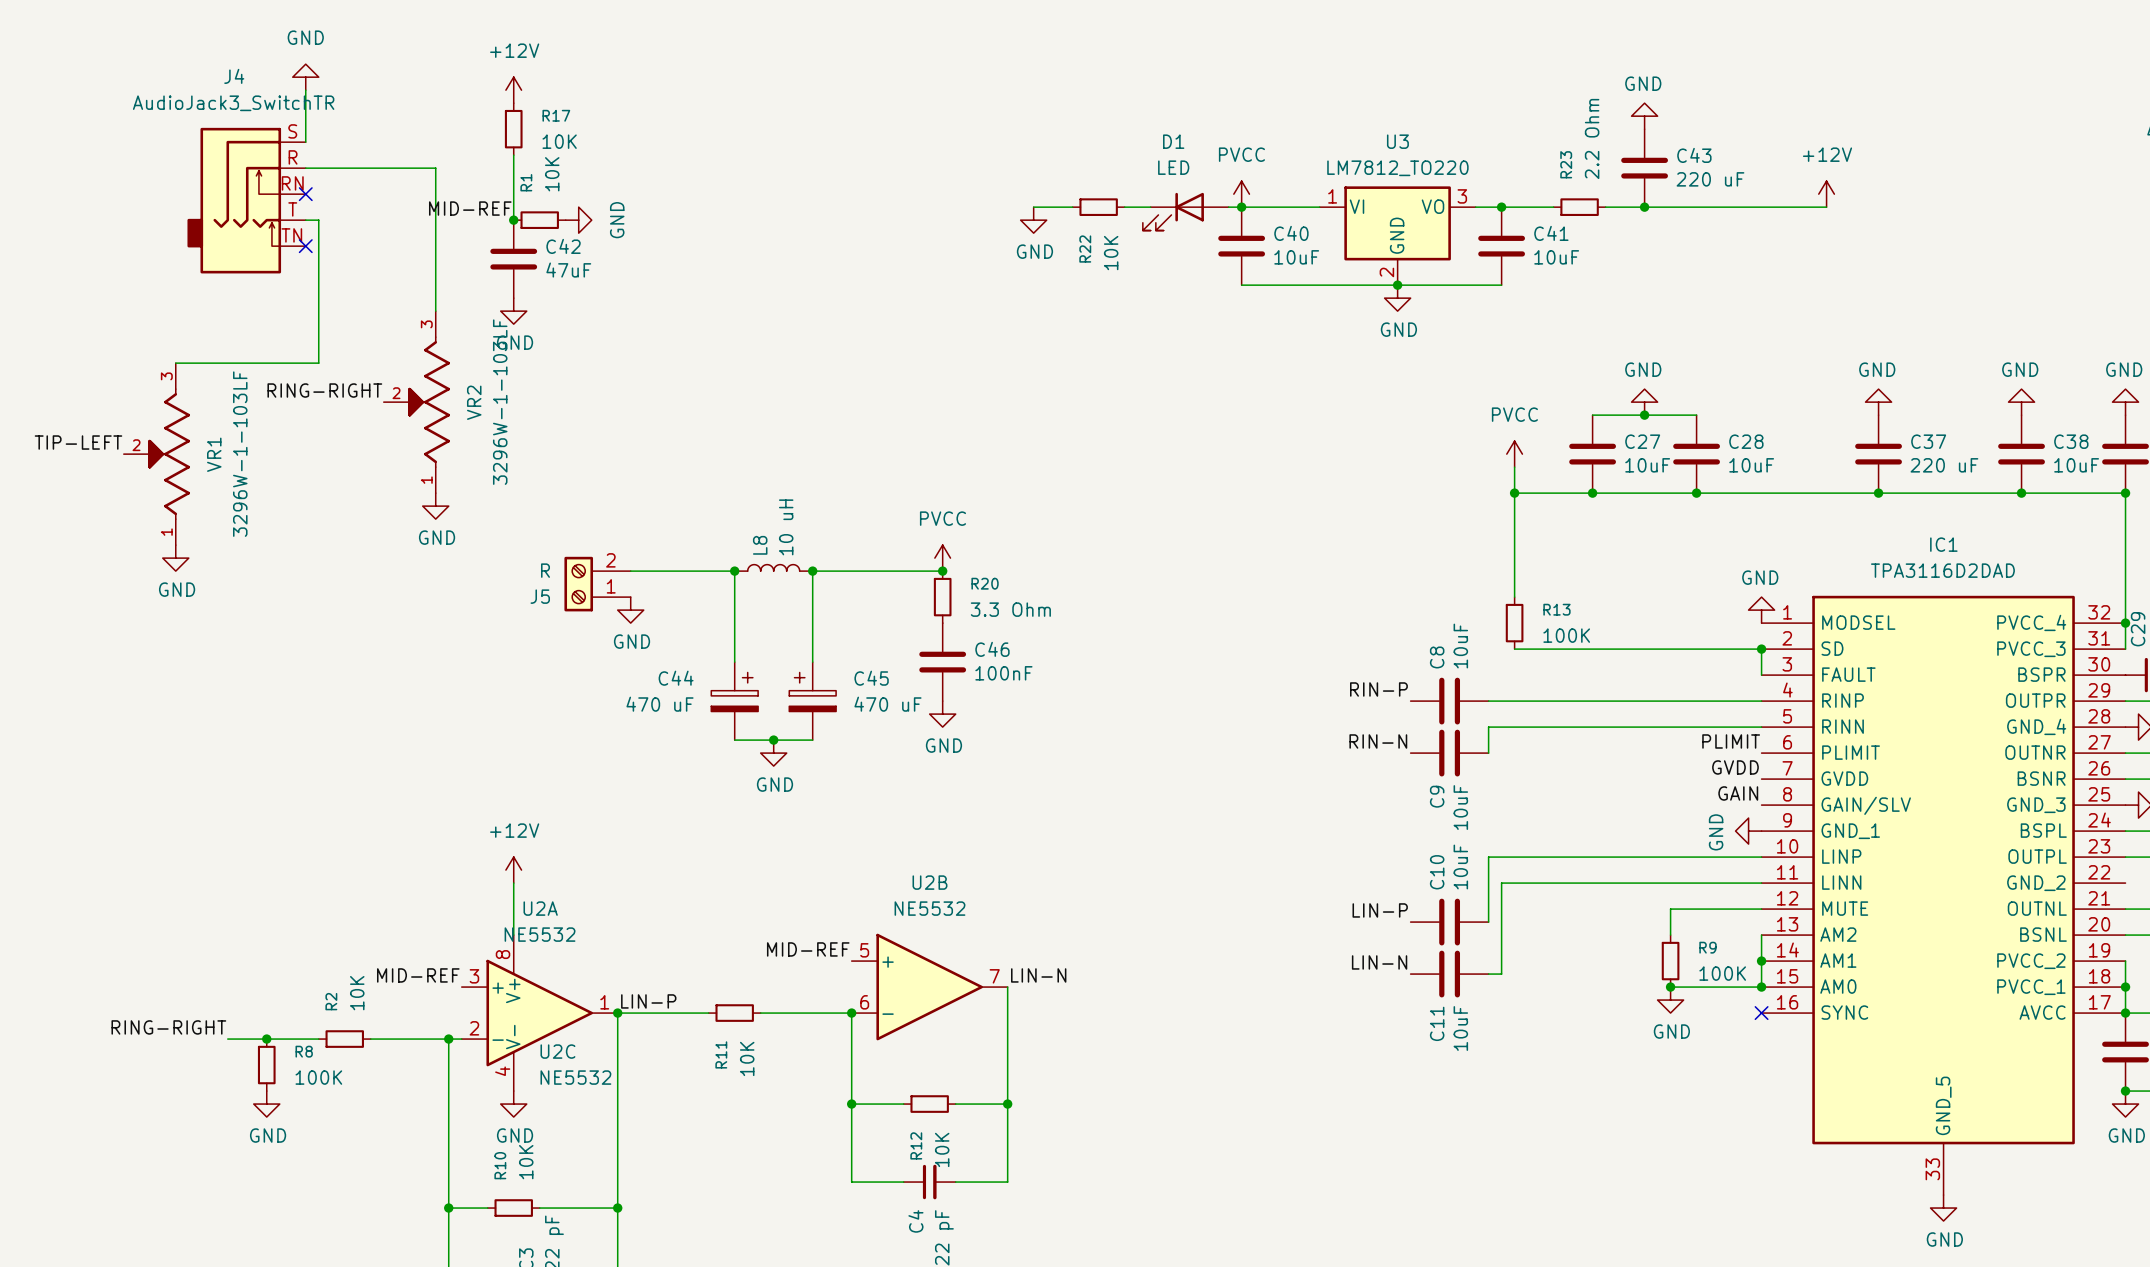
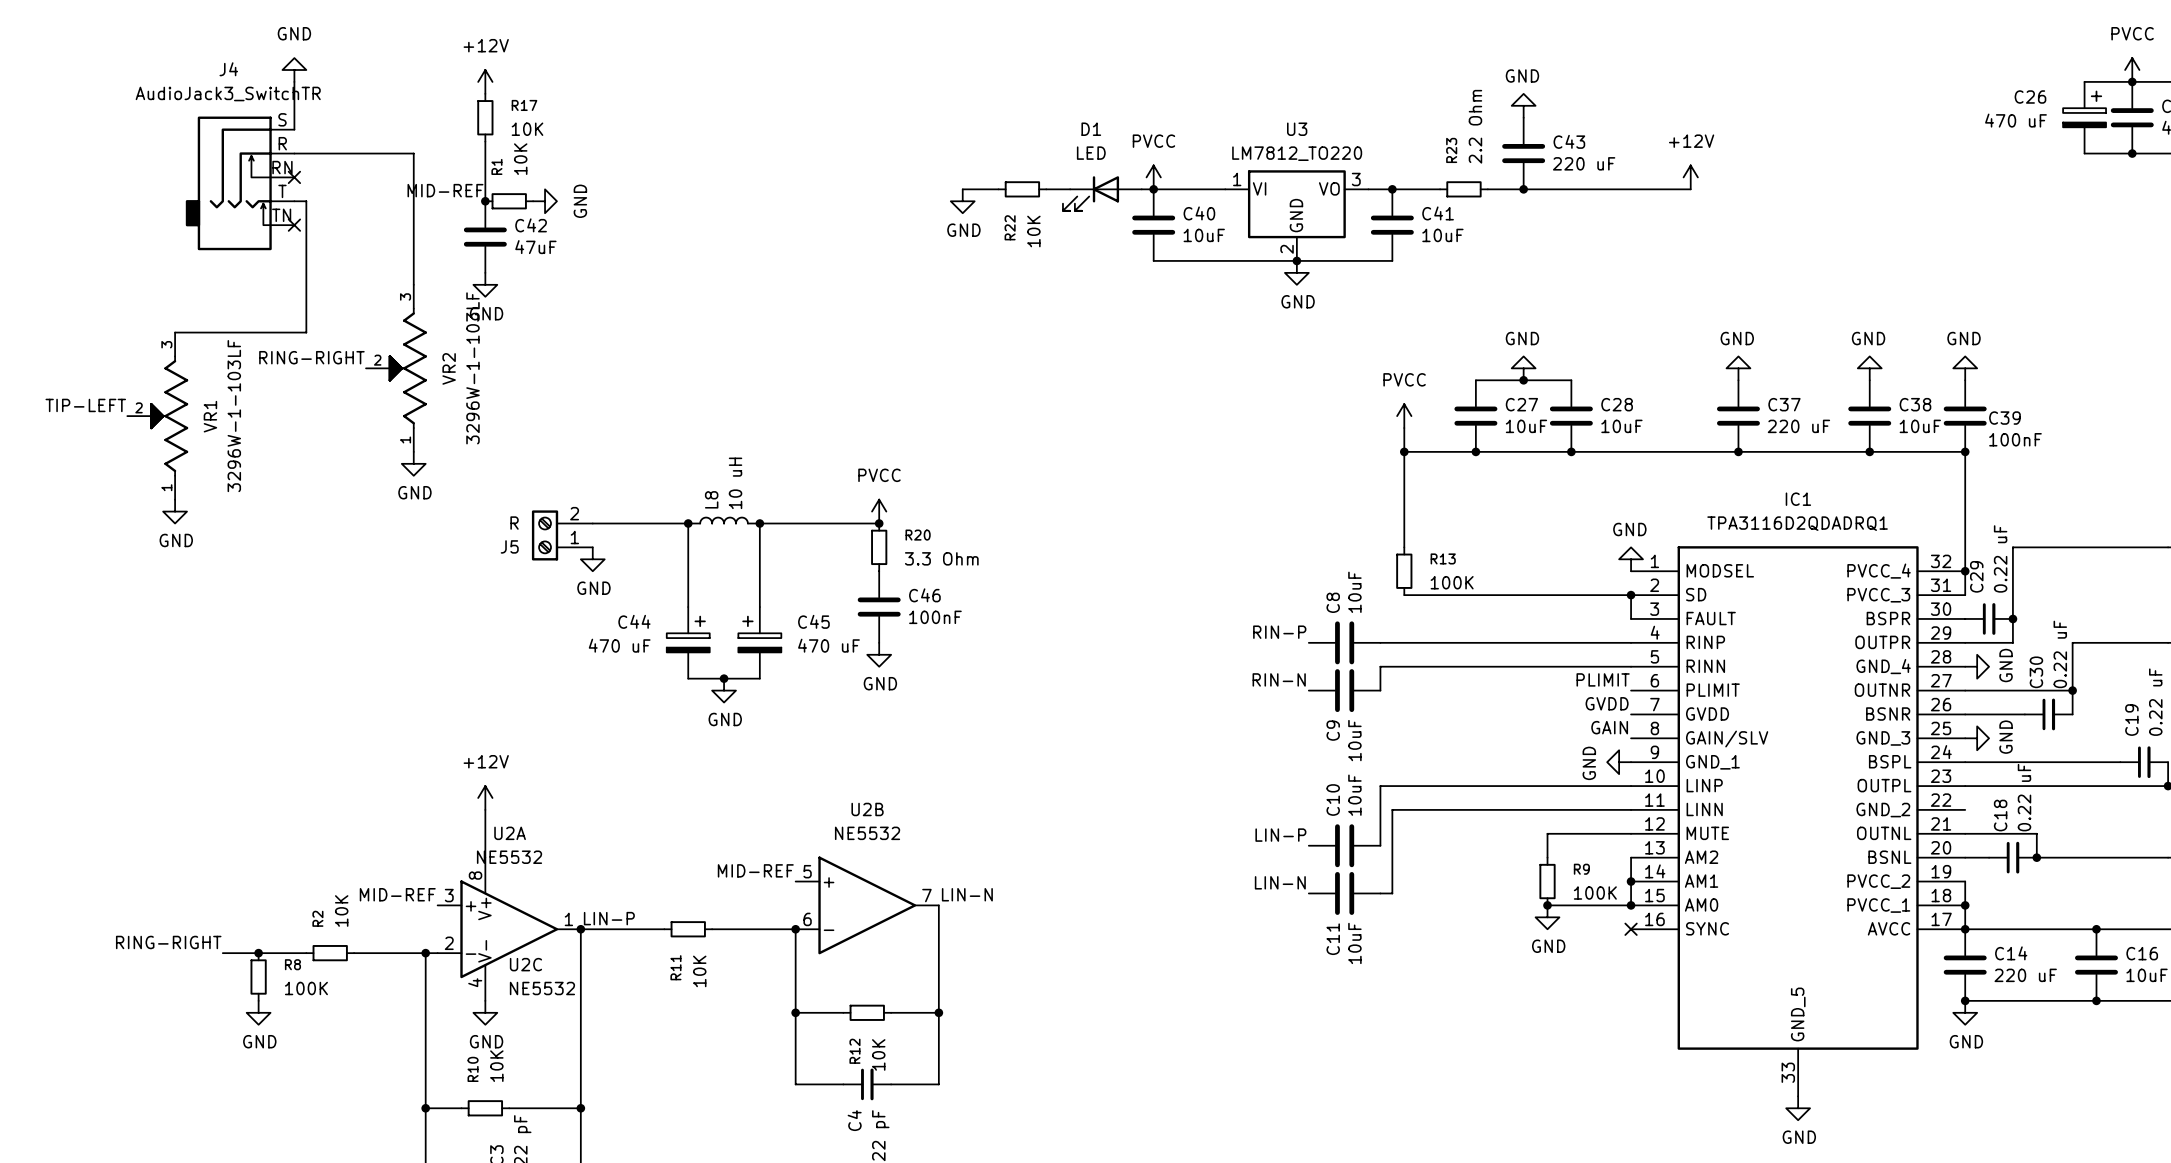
IC1 value: TPA3116D2DAD (1942, 570) -> TPA3116D2QDADRQ1 (1797, 523)

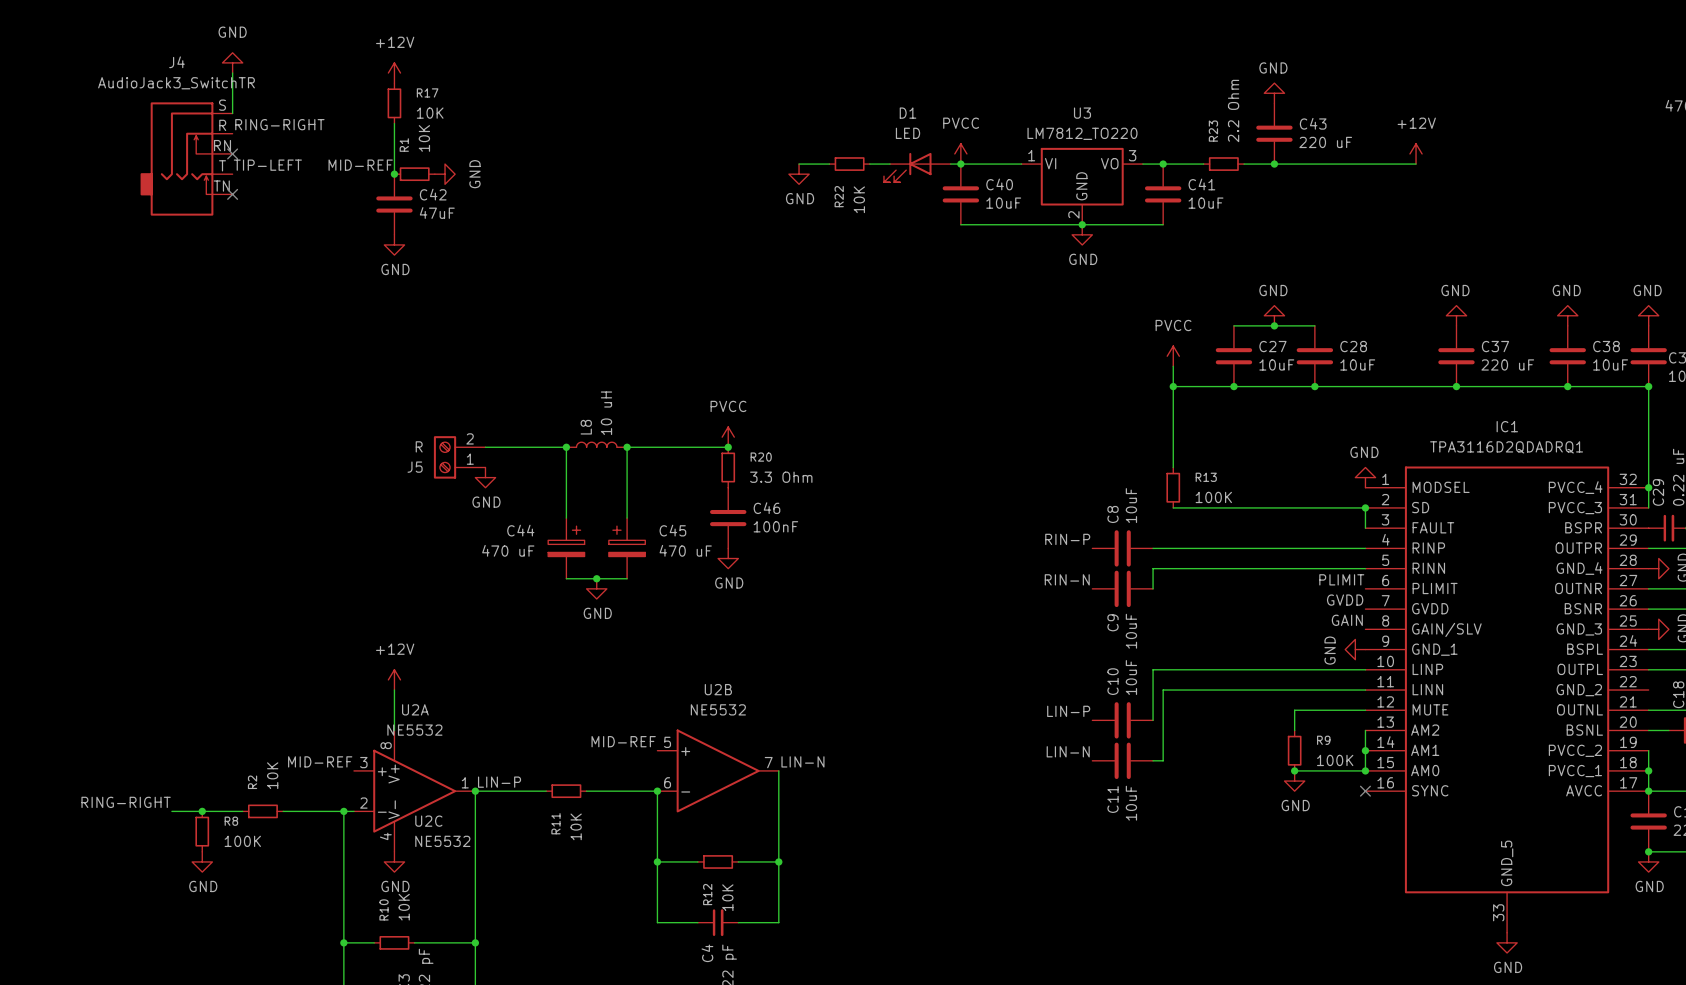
wire: (294, 153) (413, 153) (413, 284) -> none
label: none -> TIP-LEFT (267, 165)
wire: (294, 201) (306, 201) (306, 332) (175, 332) -> none
label position: RING-RIGHT (311, 357) -> RING-RIGHT (279, 124)
VR2: 3296W-1-103LF (396, 368) -> none
label: TIP-LEFT (85, 405) -> none
VR1: 3296W-1-103LF (157, 416) -> none
power symbol: GND (413, 463) -> none
power symbol: GND (175, 511) -> none

